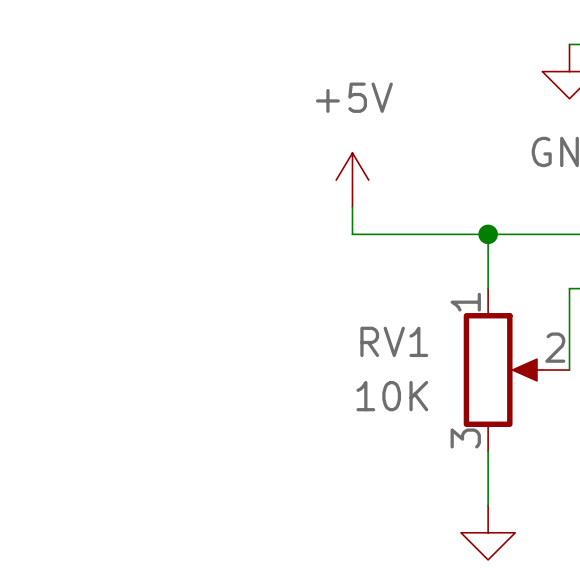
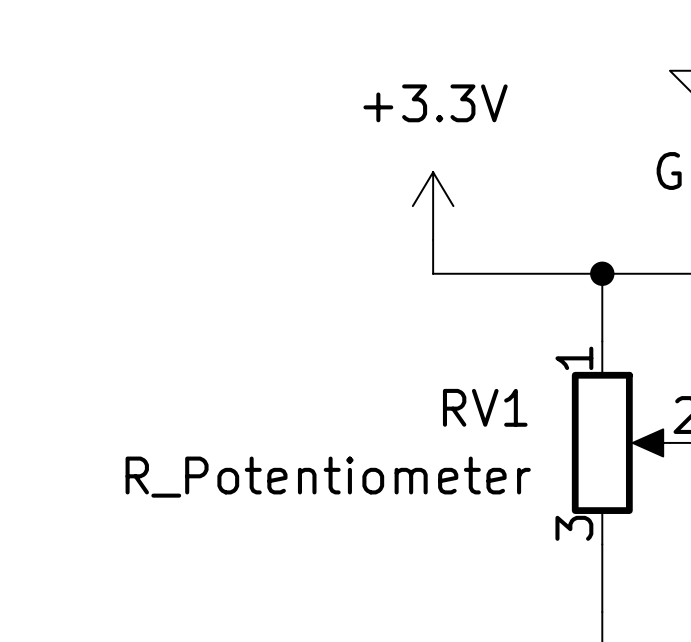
power symbol: +5V (352, 180) -> +3.3V (433, 206)
RV1 value: 10K (392, 396) -> R_Potentiometer (328, 477)

